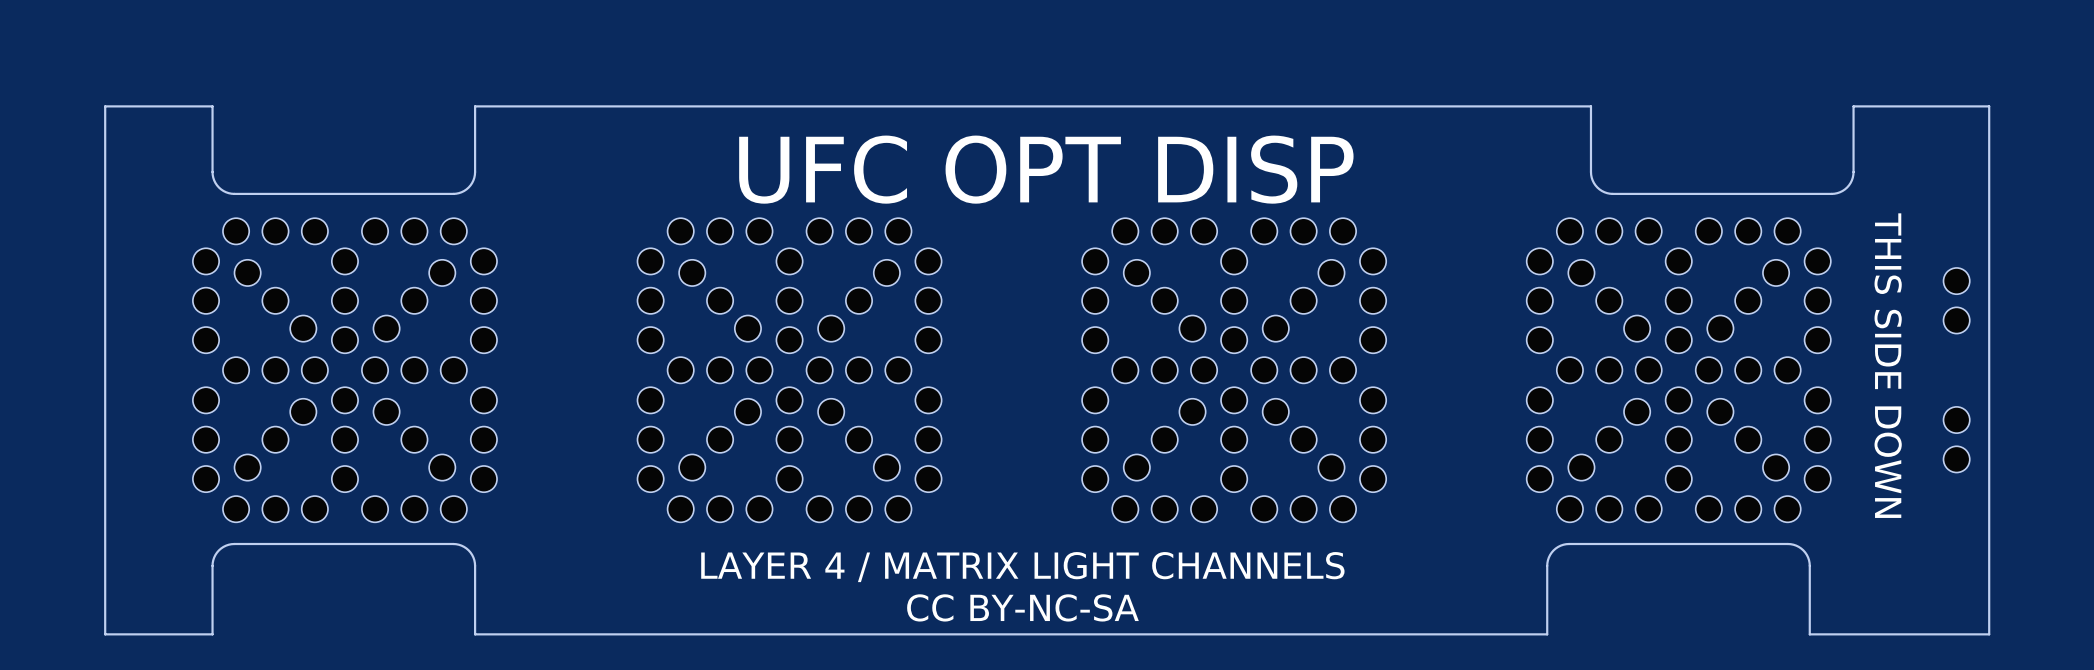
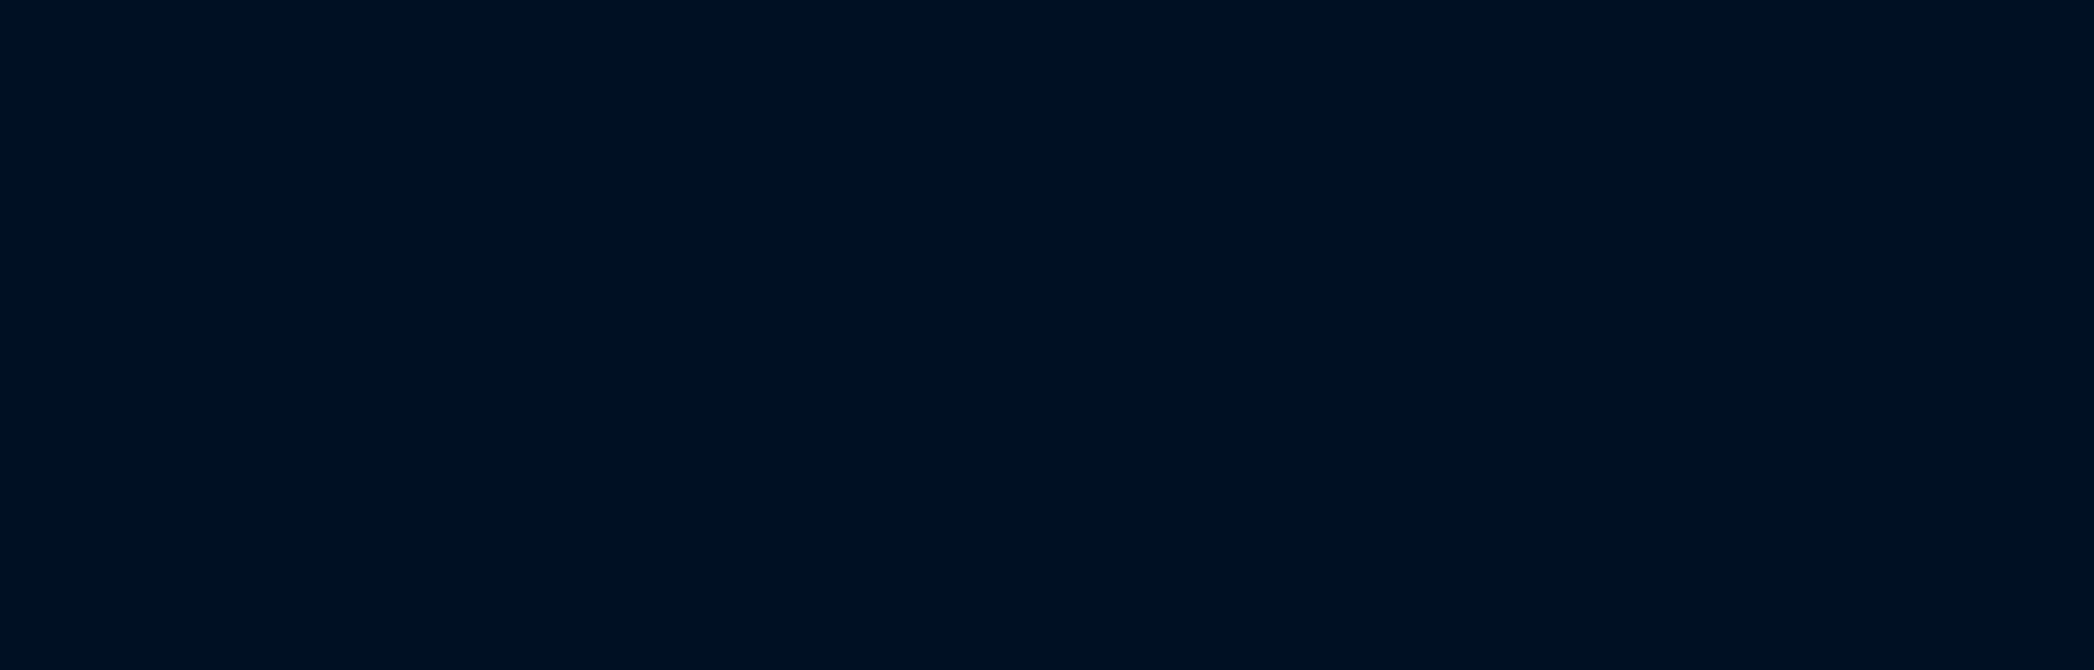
board edge: (1989, 106) (1853, 106) (1852, 177) (1844, 189) (1831, 193) (1612, 193) (1604, 192) (1595, 185) (1591, 174) (1590, 106) (475, 106) (474, 174) (470, 185) (461, 192) (453, 193) (234, 193) (221, 189) (213, 177) (212, 106) (105, 106) (105, 634) (212, 634) (213, 560) (221, 548) (234, 543) (453, 543) (461, 545) (470, 552) (474, 563) (475, 634) (1547, 634) (1547, 563) (1551, 552) (1560, 545) (1569, 543) (1787, 543) (1801, 548) (1809, 560) (1809, 634) (1989, 634) (1989, 106) -> none
text: UFC OPT DISP (1046, 169) -> none
part: (275, 231) -> none
part: (414, 231) -> none
part: (720, 231) -> none
part: (859, 231) -> none
part: (1164, 231) -> none
part: (1303, 231) -> none
part: (1609, 231) -> none
part: (1748, 231) -> none
part: (206, 300) -> none
part: (275, 300) -> none
part: (344, 300) -> none
part: (414, 300) -> none
part: (483, 300) -> none
part: (650, 300) -> none
part: (720, 300) -> none
part: (789, 300) -> none
part: (859, 300) -> none
part: (928, 300) -> none
part: (1095, 300) -> none
part: (1164, 300) -> none
part: (1234, 300) -> none
part: (1303, 300) -> none
part: (1373, 300) -> none
part: (1539, 300) -> none
part: (1609, 300) -> none
part: (1678, 300) -> none
part: (1748, 300) -> none
part: (1817, 300) -> none
part: (1956, 300) -> none
text: THIS SIDE DOWN (1888, 365) -> none
part: (275, 370) -> none
part: (414, 370) -> none
part: (720, 370) -> none
part: (859, 370) -> none
part: (1164, 370) -> none
part: (1303, 370) -> none
part: (1609, 370) -> none
part: (1748, 370) -> none
part: (206, 439) -> none
part: (275, 439) -> none
part: (344, 439) -> none
part: (414, 439) -> none
part: (483, 439) -> none
part: (650, 439) -> none
part: (720, 439) -> none
part: (789, 439) -> none
part: (859, 439) -> none
part: (928, 439) -> none
part: (1095, 439) -> none
part: (1164, 439) -> none
part: (1234, 439) -> none
part: (1303, 439) -> none
part: (1373, 439) -> none
part: (1539, 439) -> none
part: (1609, 439) -> none
part: (1678, 439) -> none
part: (1748, 439) -> none
part: (1817, 439) -> none
part: (1956, 439) -> none
part: (275, 509) -> none
part: (414, 509) -> none
part: (720, 509) -> none
part: (859, 509) -> none
part: (1164, 509) -> none
part: (1303, 509) -> none
part: (1609, 509) -> none
part: (1748, 509) -> none
text: LAYER 4 / MATRIX LIGHT CHANNELS (1022, 567) -> none
text: CC BY-NC-SA (1022, 607) -> none

